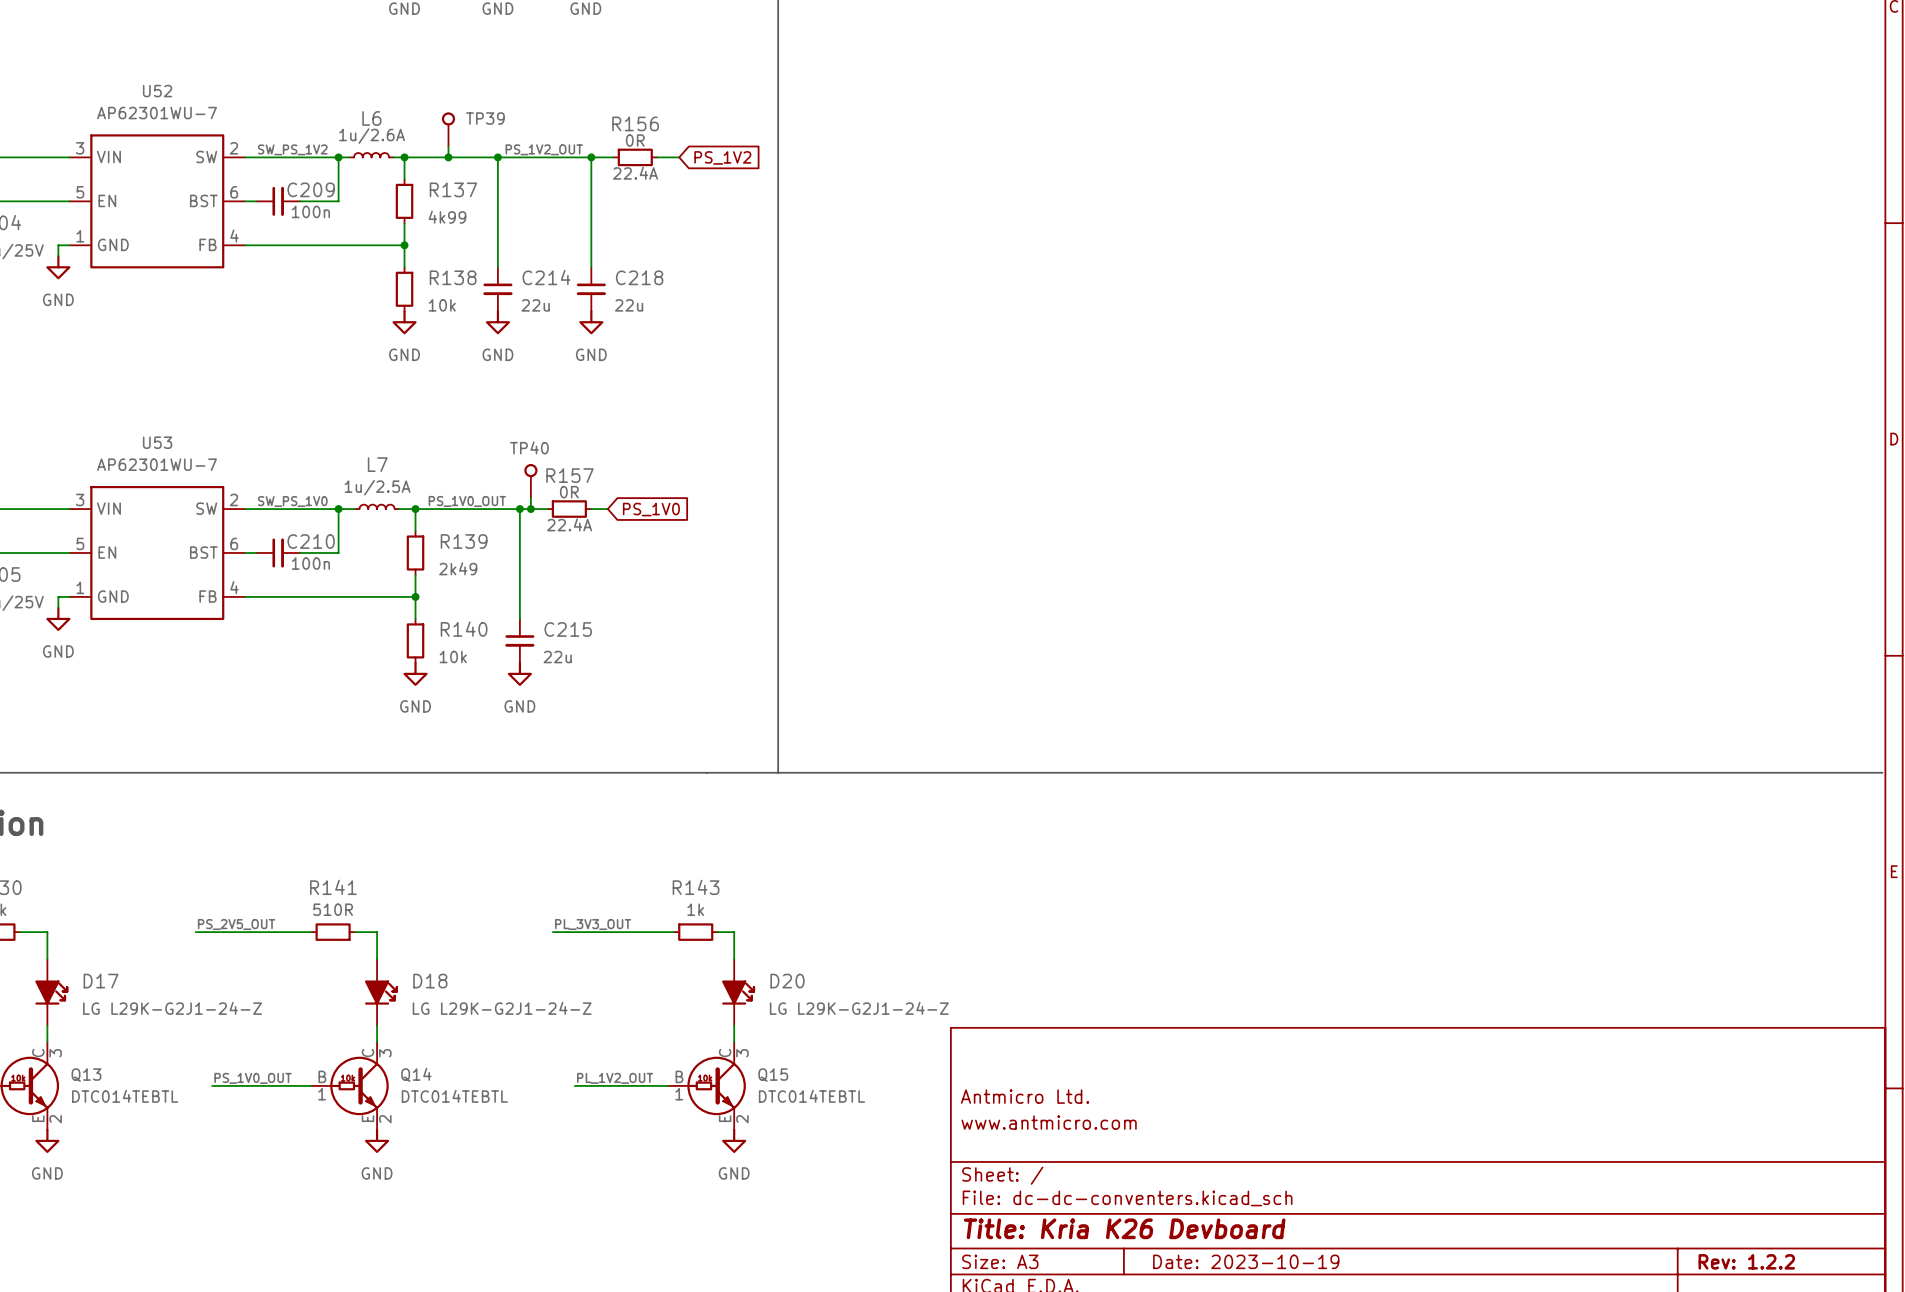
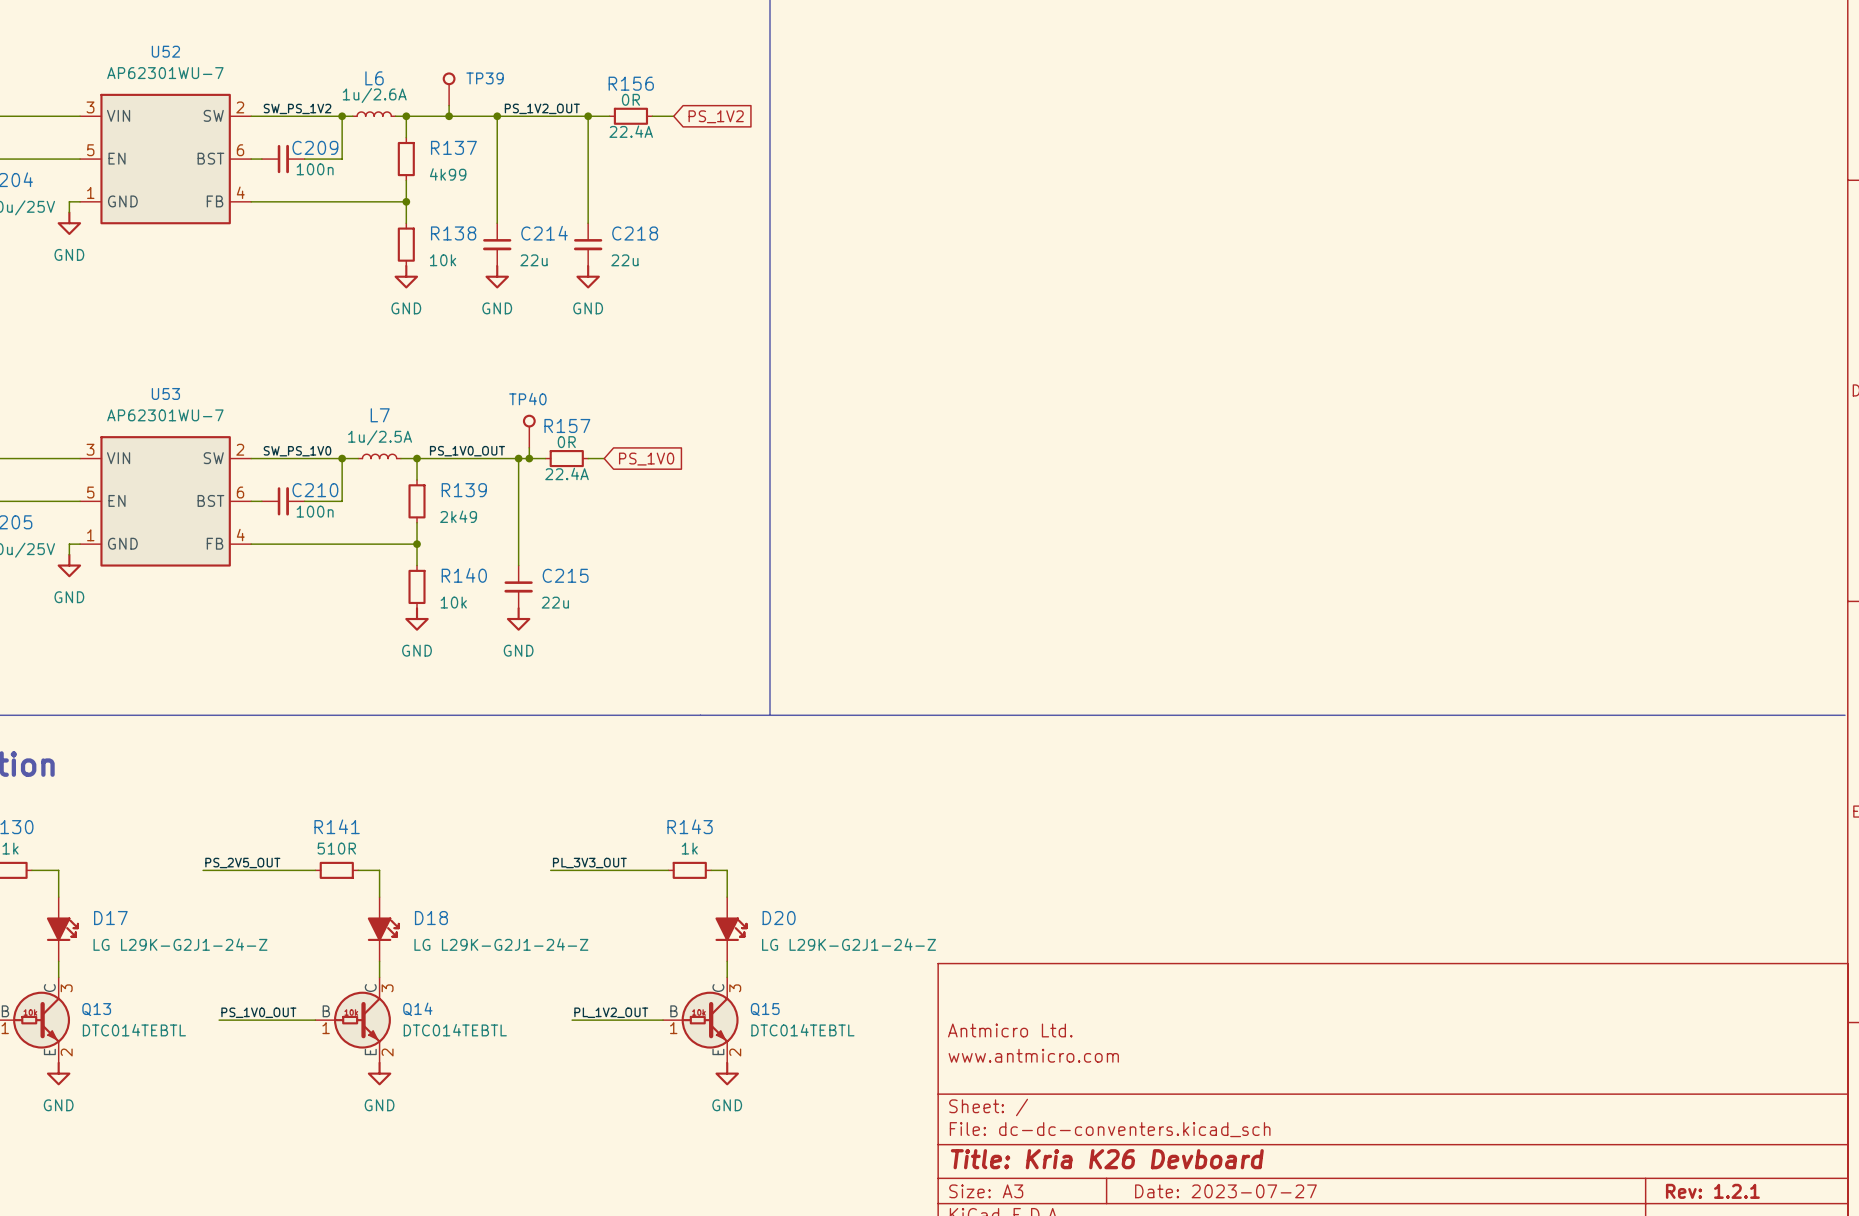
title block: Date: 2023-10-19 (1246, 1261) -> Date: 2023-07-27 (1225, 1191)
title block: Rev: 1.2.2 (1746, 1261) -> Rev: 1.2.1 (1712, 1191)

